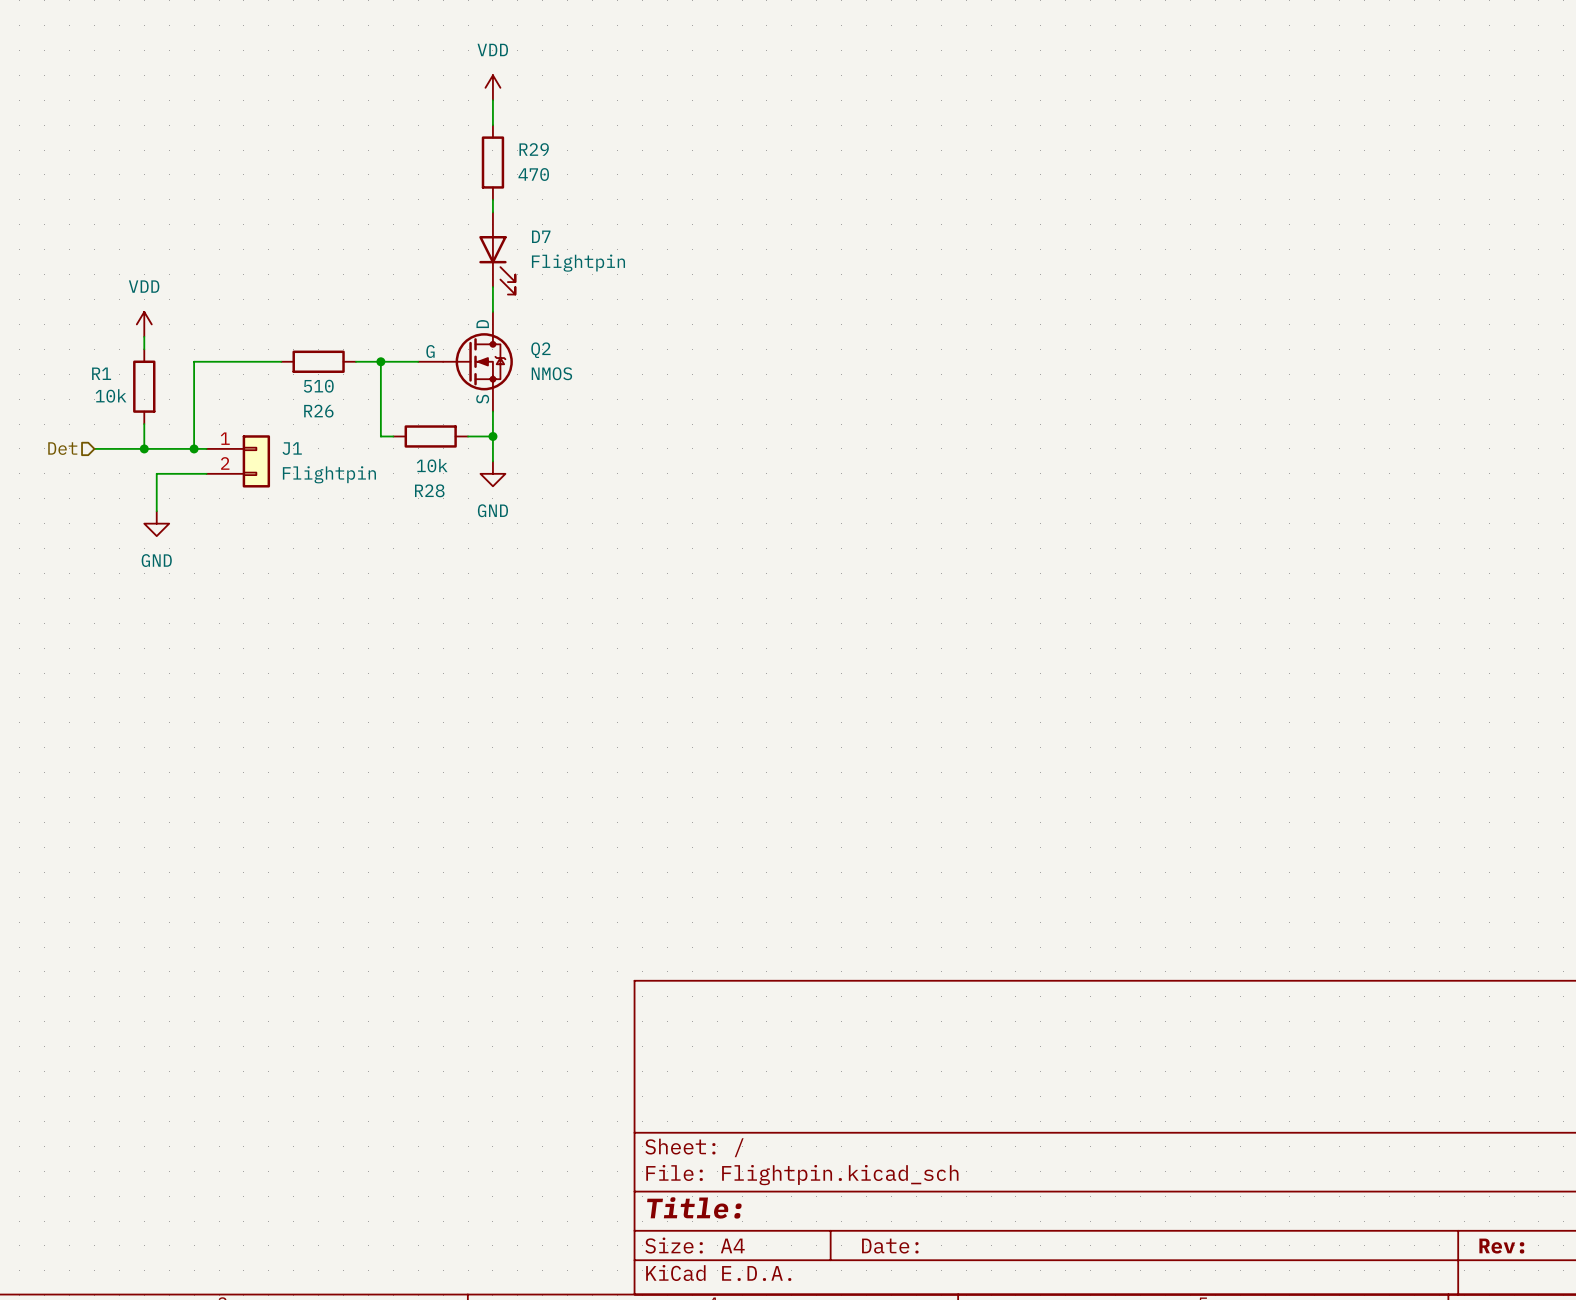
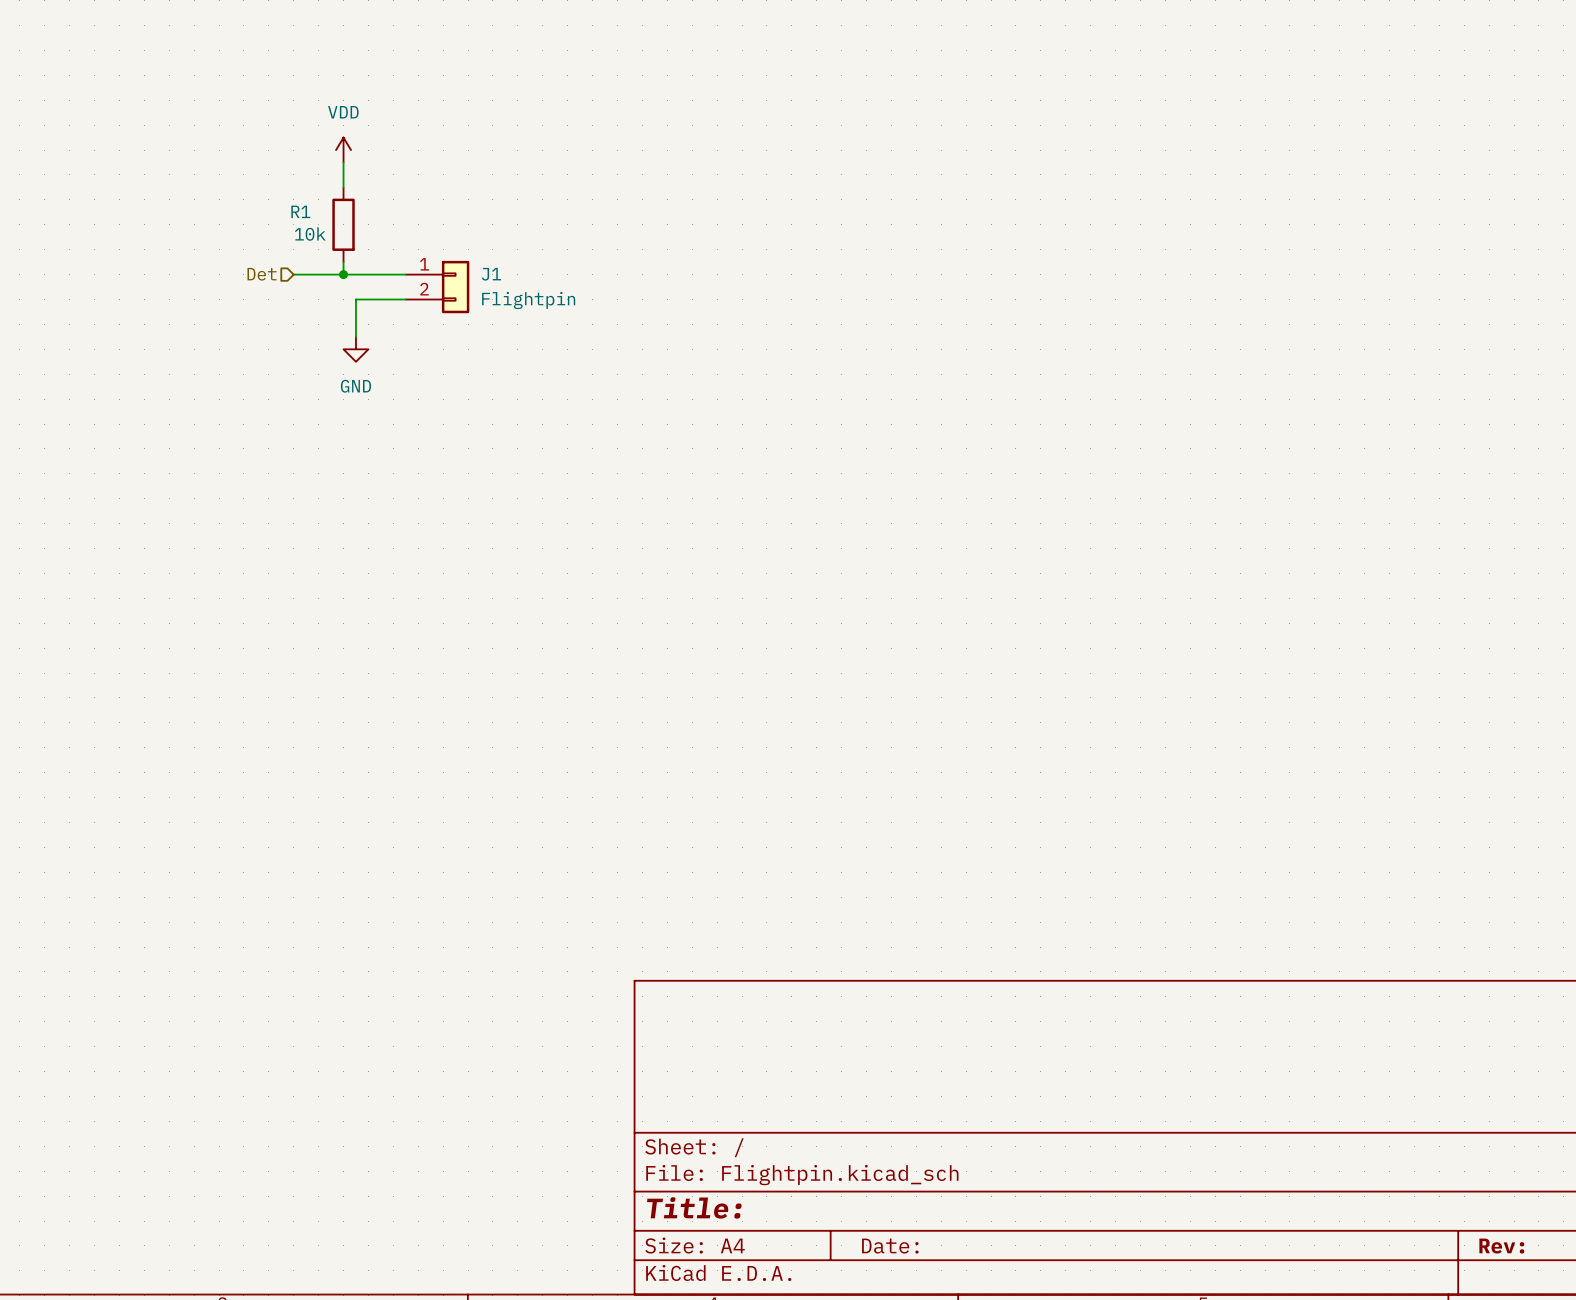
power symbol: VDD (492, 87) -> none
wire: (492, 100) (492, 125) -> (343, 162) (343, 187)
power symbol: none -> VDD (343, 150)
R29: 470 (492, 162) -> none
wire: (492, 199) (492, 212) -> (343, 262) (343, 274)
D7: Flightpin (497, 253) -> none
hierarchical label: none -> Det (262, 274)
wire: none -> (293, 274) (405, 274)
junction: none -> (343, 274)
wire: (492, 287) (492, 311) -> none
wire: none -> (405, 299) (355, 299) (355, 336)
power symbol: VDD (144, 324) -> none
wire: (144, 336) (144, 349) -> none
power symbol: none -> GND (355, 349)
wire: (281, 361) (194, 361) (194, 448) -> none
R26: 510 (318, 361) -> none
wire: (355, 361) (418, 361) -> none
wire: (380, 361) (380, 436) (393, 436) -> none
junction: (380, 361) -> none
Q2: NMOS (465, 361) -> none
R1 position: (144, 386) -> (343, 224)
wire: (492, 411) (492, 461) -> none
wire: (144, 424) (144, 448) -> none
R28: 10k (430, 436) -> none
wire: (468, 436) (492, 436) -> none
junction: (492, 436) -> none
hierarchical label: Det (62, 448) -> none
wire: (94, 448) (206, 448) -> none
junction: (144, 448) -> none
junction: (194, 448) -> none
J1 position: (238, 461) -> (437, 287)
wire: (206, 473) (156, 473) (156, 511) -> none
power symbol: GND (492, 473) -> none
power symbol: GND (156, 523) -> none

